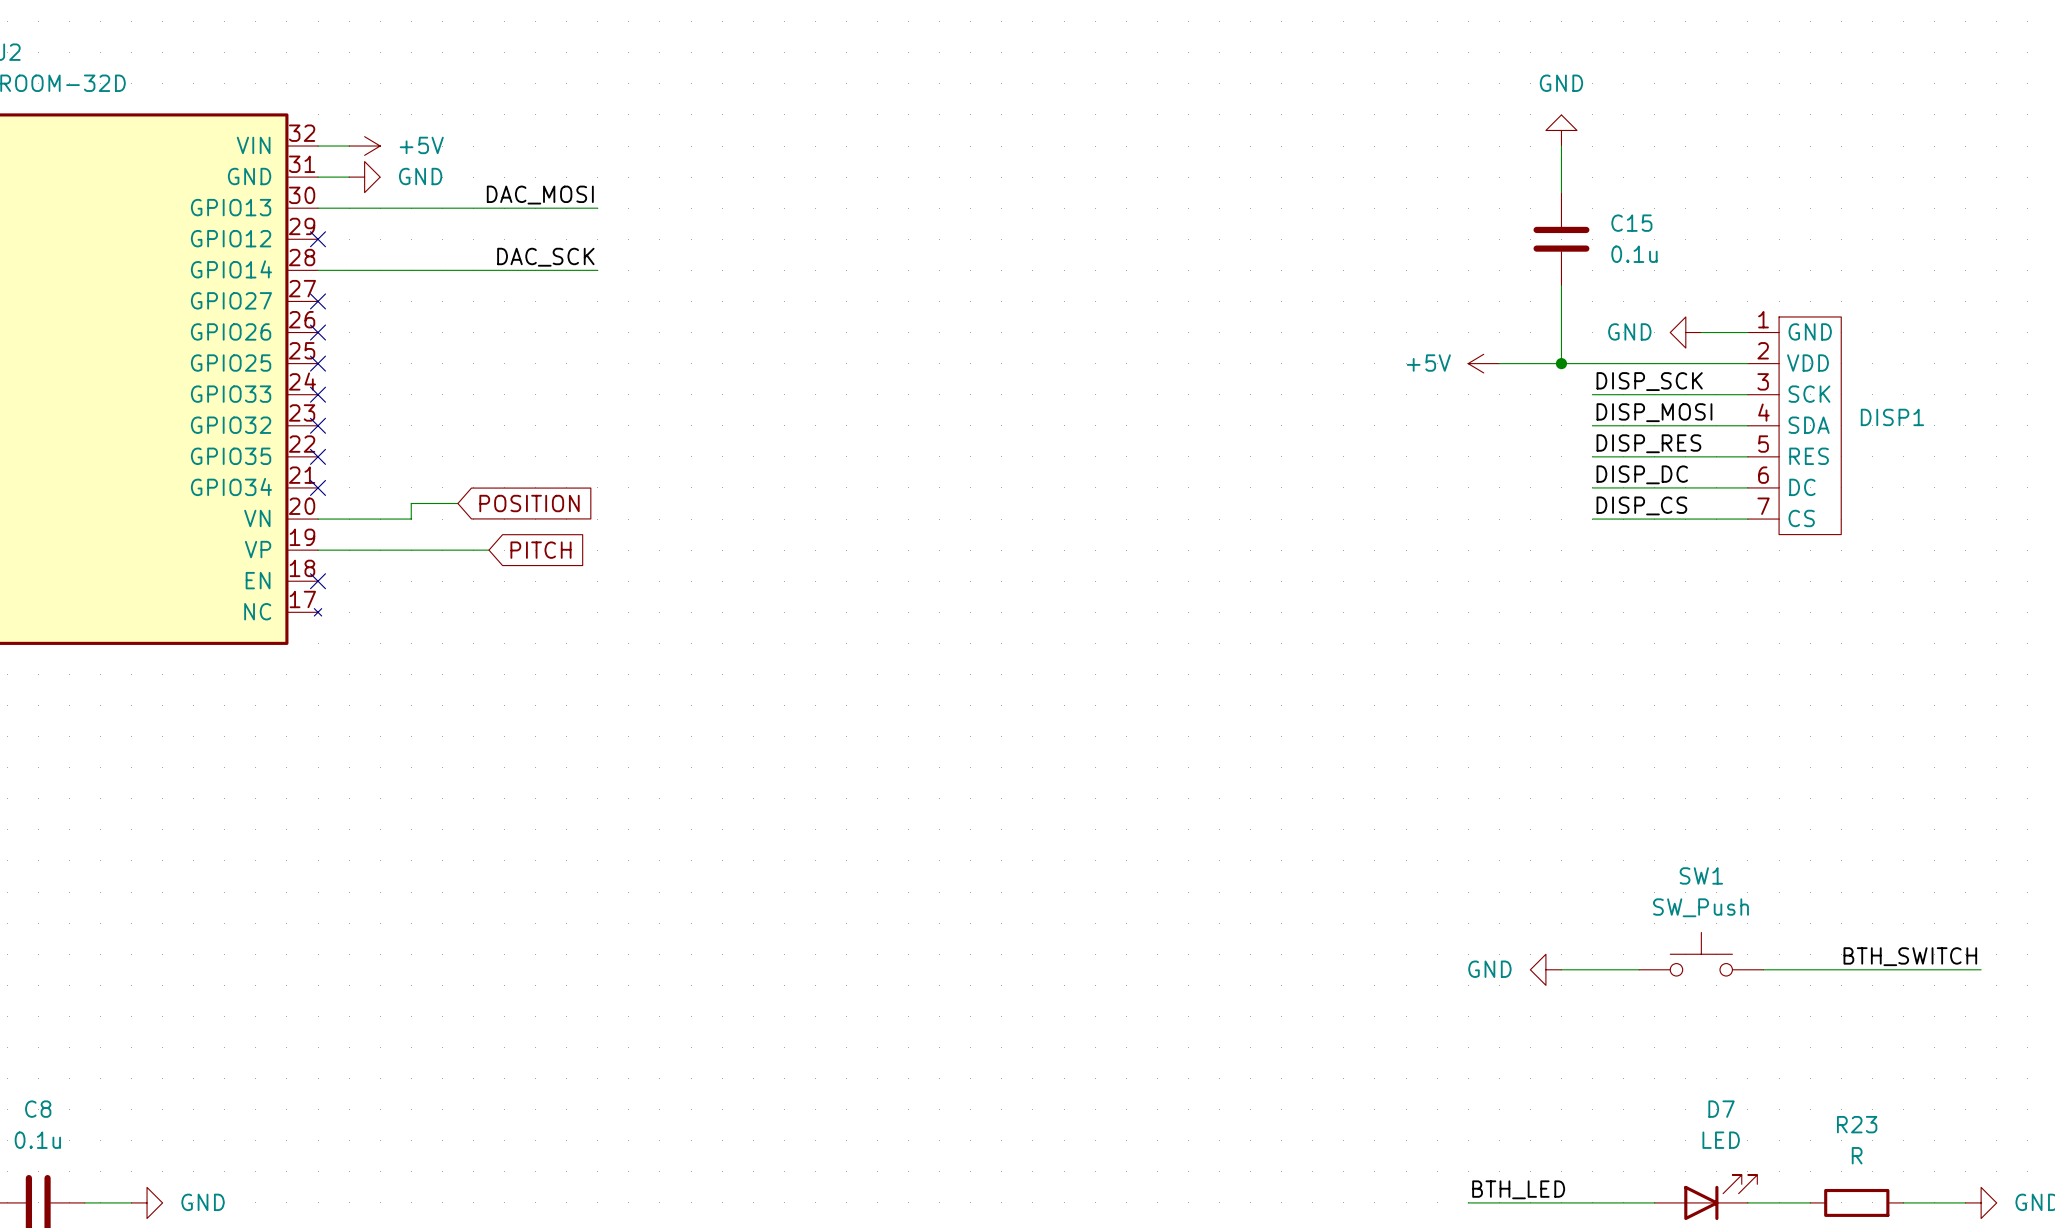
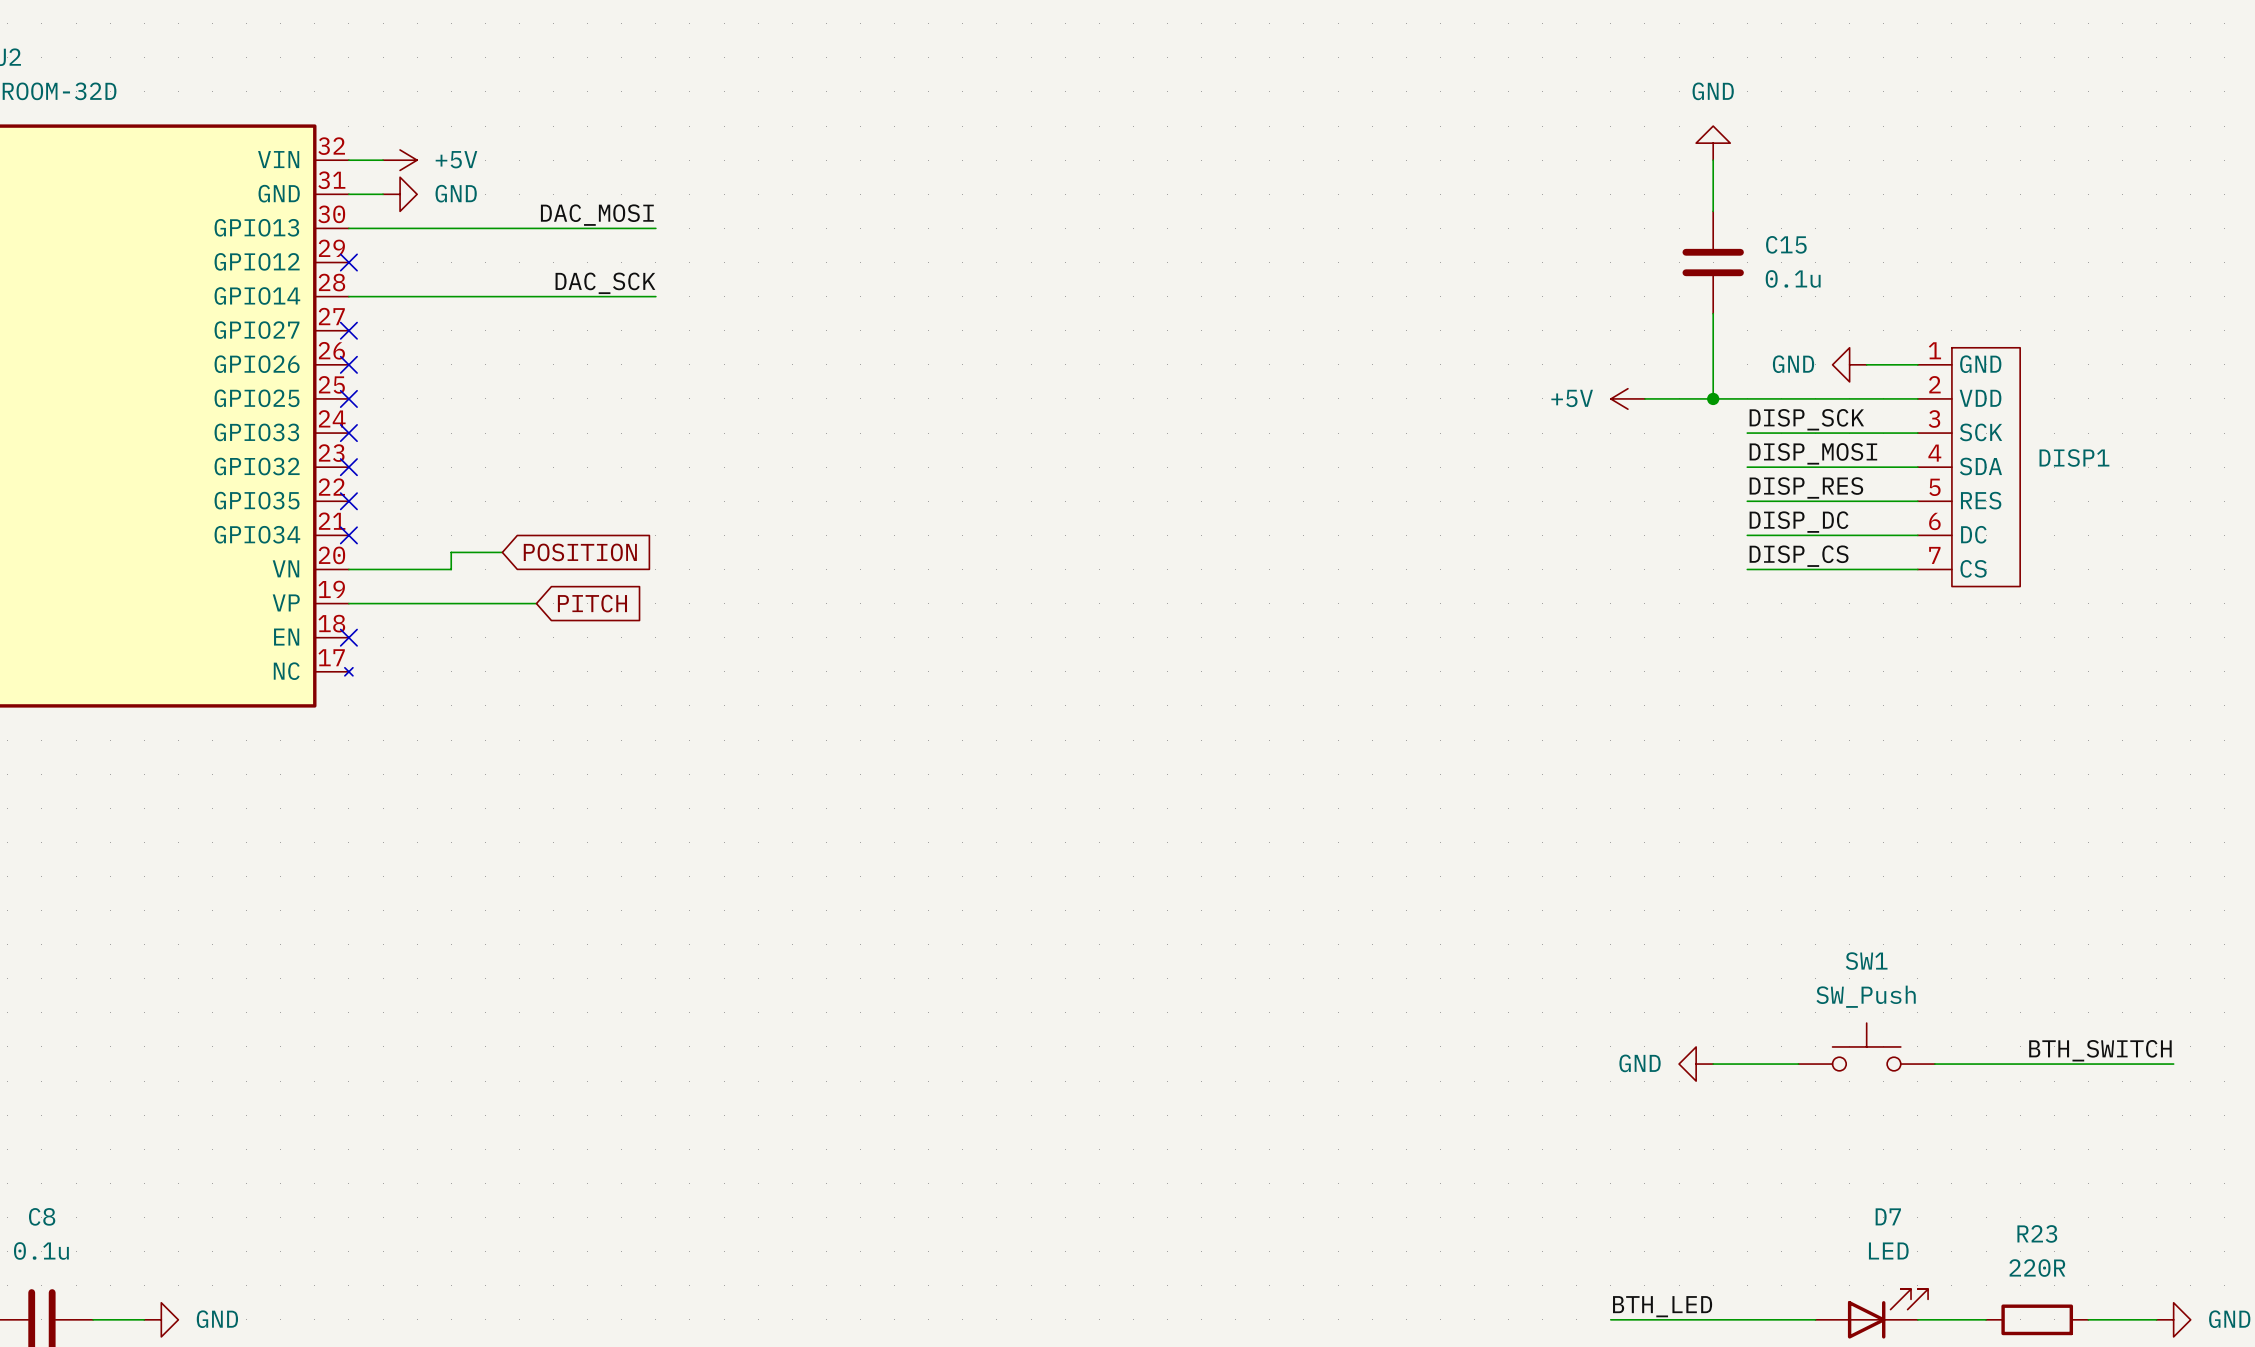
R23 value: R (1857, 1155) -> 220R (2037, 1268)

